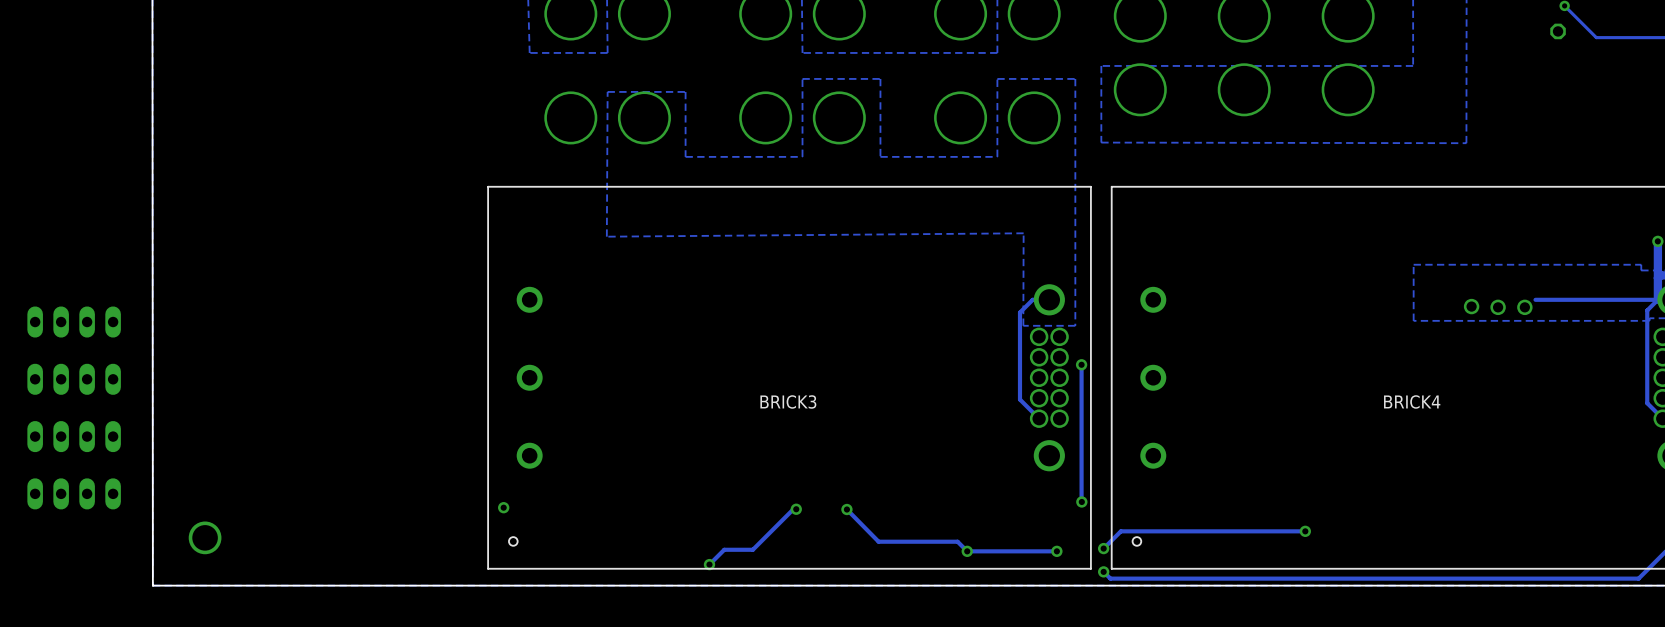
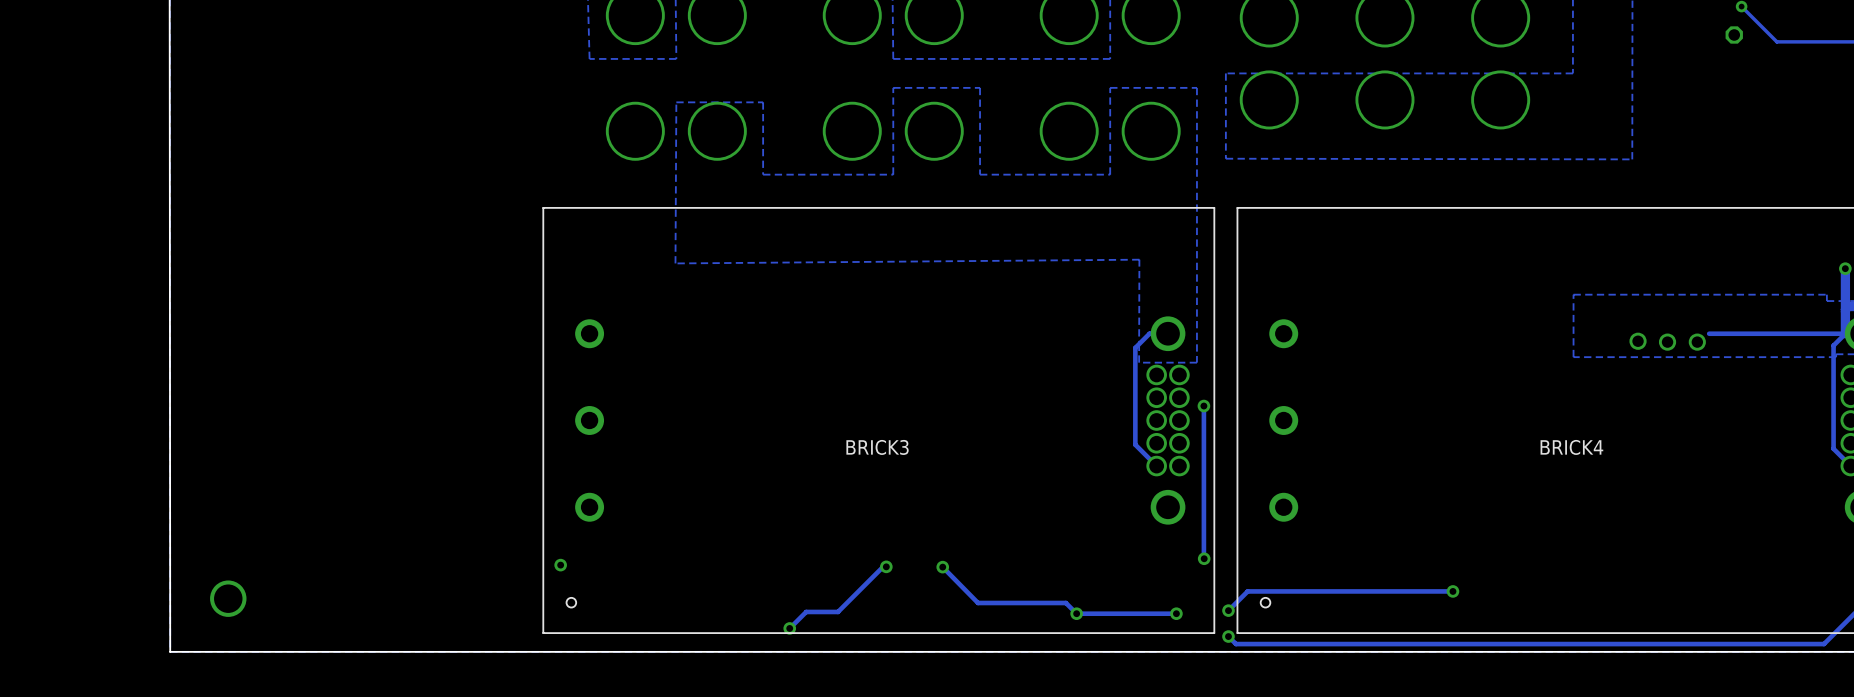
part: (74, 322) -> none
part: (74, 379) -> none
part: (74, 436) -> none
part: (74, 493) -> none

